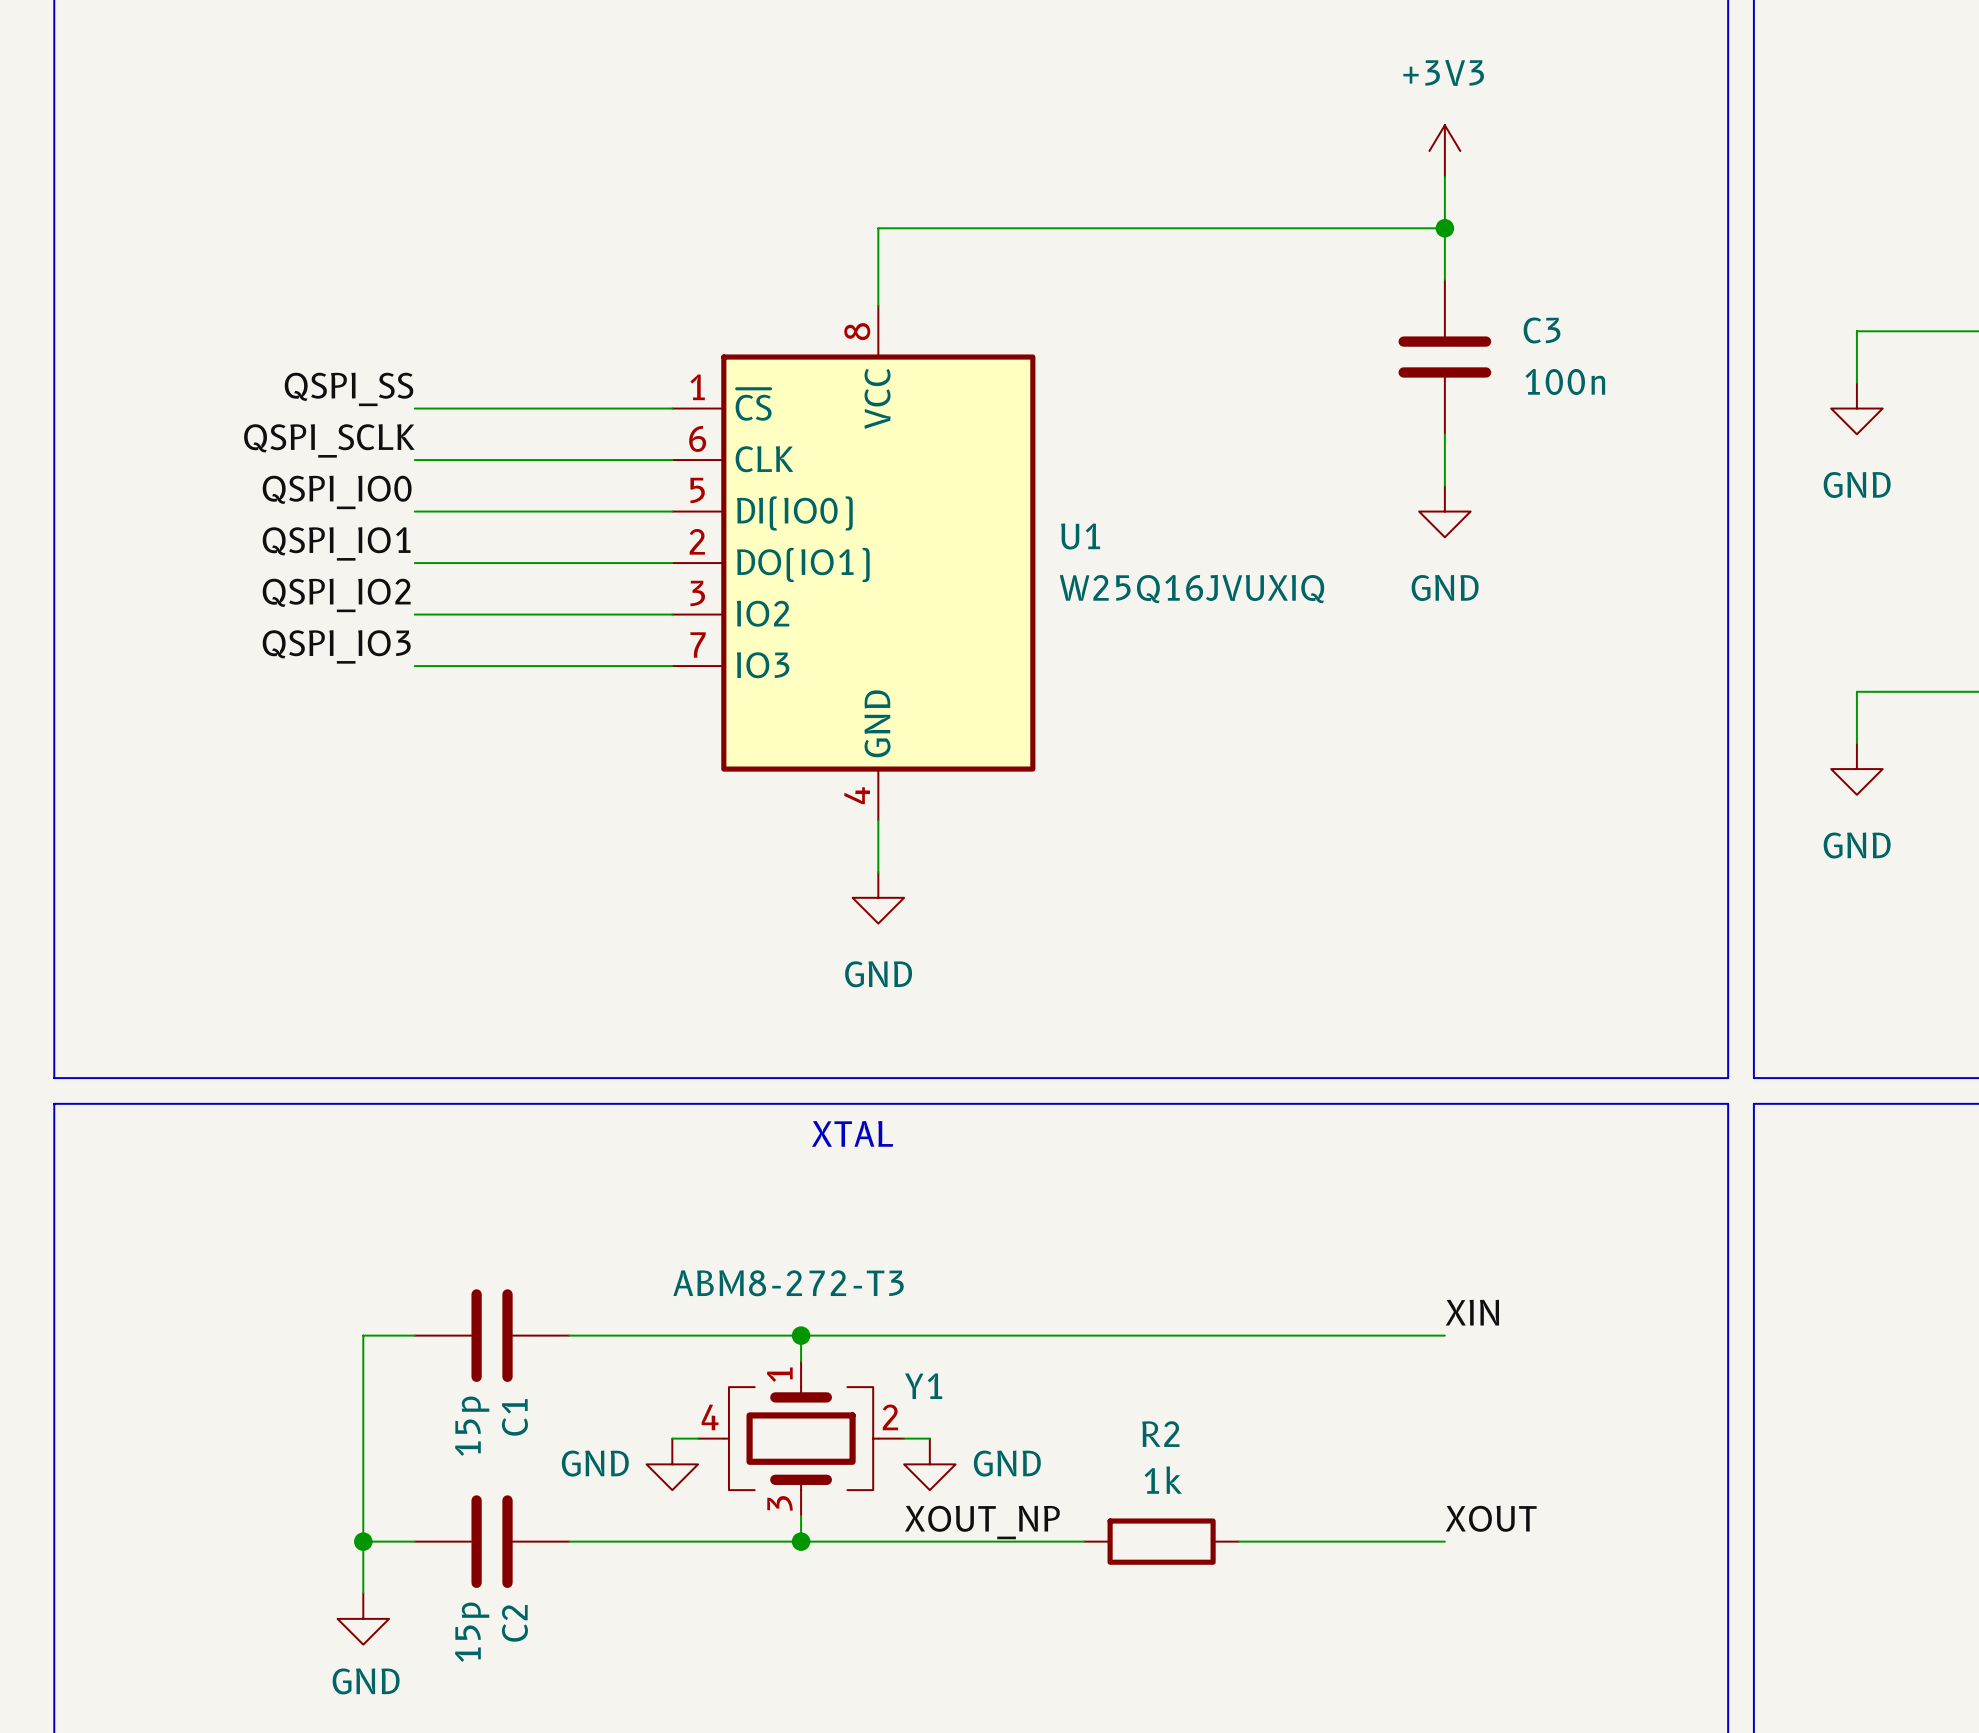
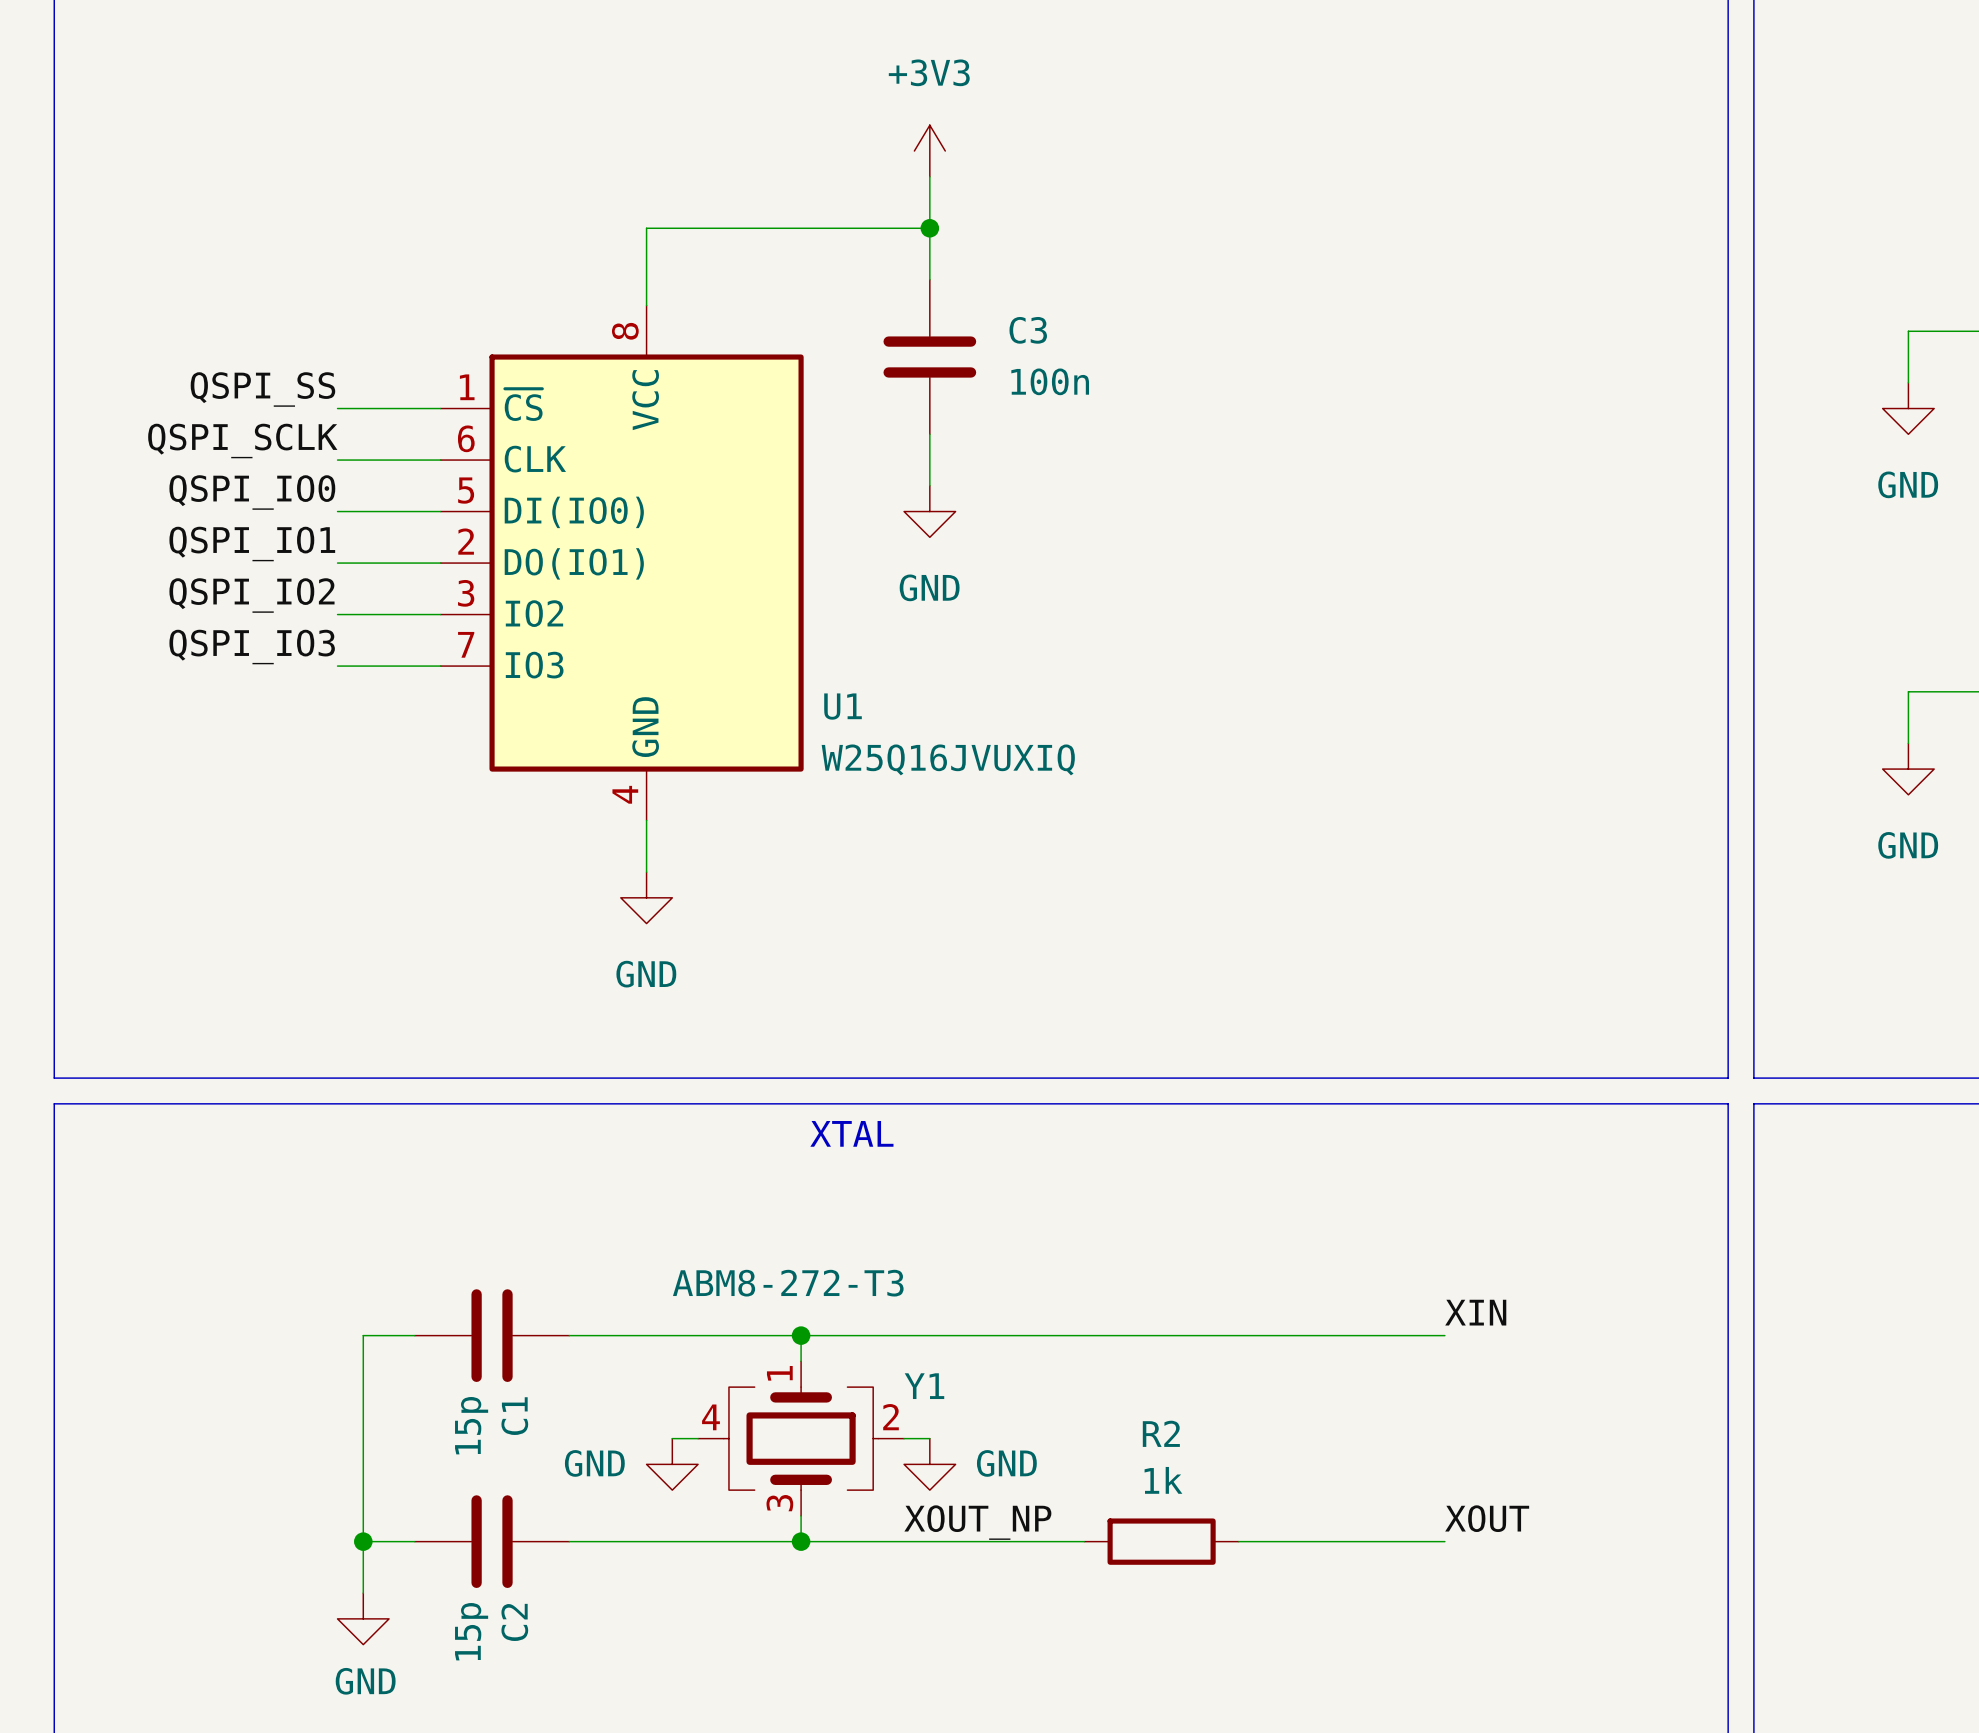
power symbol: none -> +3V3 (929, 151)
power symbol: +3V3 (1444, 151) -> none
wire: none -> (929, 176) (929, 279)
wire: (1444, 176) (1444, 279) -> none
wire: (878, 228) (878, 305) -> (878, 228) (646, 228) (646, 305)
wire: (929, 228) (1444, 228) -> none
junction: none -> (929, 228)
junction: (1444, 228) -> none
wire: (1908, 331) (1856, 331) (1856, 382) -> (1908, 331) (1908, 382)
C3 position: (1444, 357) -> (929, 357)
label position: QSPI_SS (349, 389) -> QSPI_SS (262, 389)
wire: none -> (337, 408) (414, 408)
power symbol position: GND (1856, 408) -> GND (1908, 408)
wire: (1444, 434) (1444, 485) -> none
label position: QSPI_SCLK (329, 440) -> QSPI_SCLK (242, 440)
wire: none -> (337, 460) (414, 460)
label position: QSPI_IO0 (337, 492) -> QSPI_IO0 (252, 492)
wire: none -> (337, 511) (414, 511)
power symbol: none -> GND (929, 511)
power symbol: GND (1444, 511) -> none
U1 name position: U1 (1080, 536) -> U1 (843, 706)
label position: QSPI_IO1 (336, 543) -> QSPI_IO1 (252, 544)
wire: none -> (337, 563) (414, 563)
U1 position: (853, 563) -> (622, 563)
U1 value position: W25Q16JVUXIQ (1191, 589) -> W25Q16JVUXIQ (948, 759)
label position: QSPI_IO2 (336, 595) -> QSPI_IO2 (251, 595)
wire: none -> (337, 614) (414, 614)
label position: QSPI_IO3 (336, 646) -> QSPI_IO3 (252, 647)
wire: none -> (337, 666) (414, 666)
wire: (1908, 691) (1856, 691) (1856, 743) -> (1908, 691) (1908, 743)
power symbol position: GND (1856, 769) -> GND (1908, 769)
wire: (878, 820) (878, 872) -> (646, 820) (646, 872)
power symbol: none -> GND (646, 897)
power symbol: GND (878, 897) -> none

